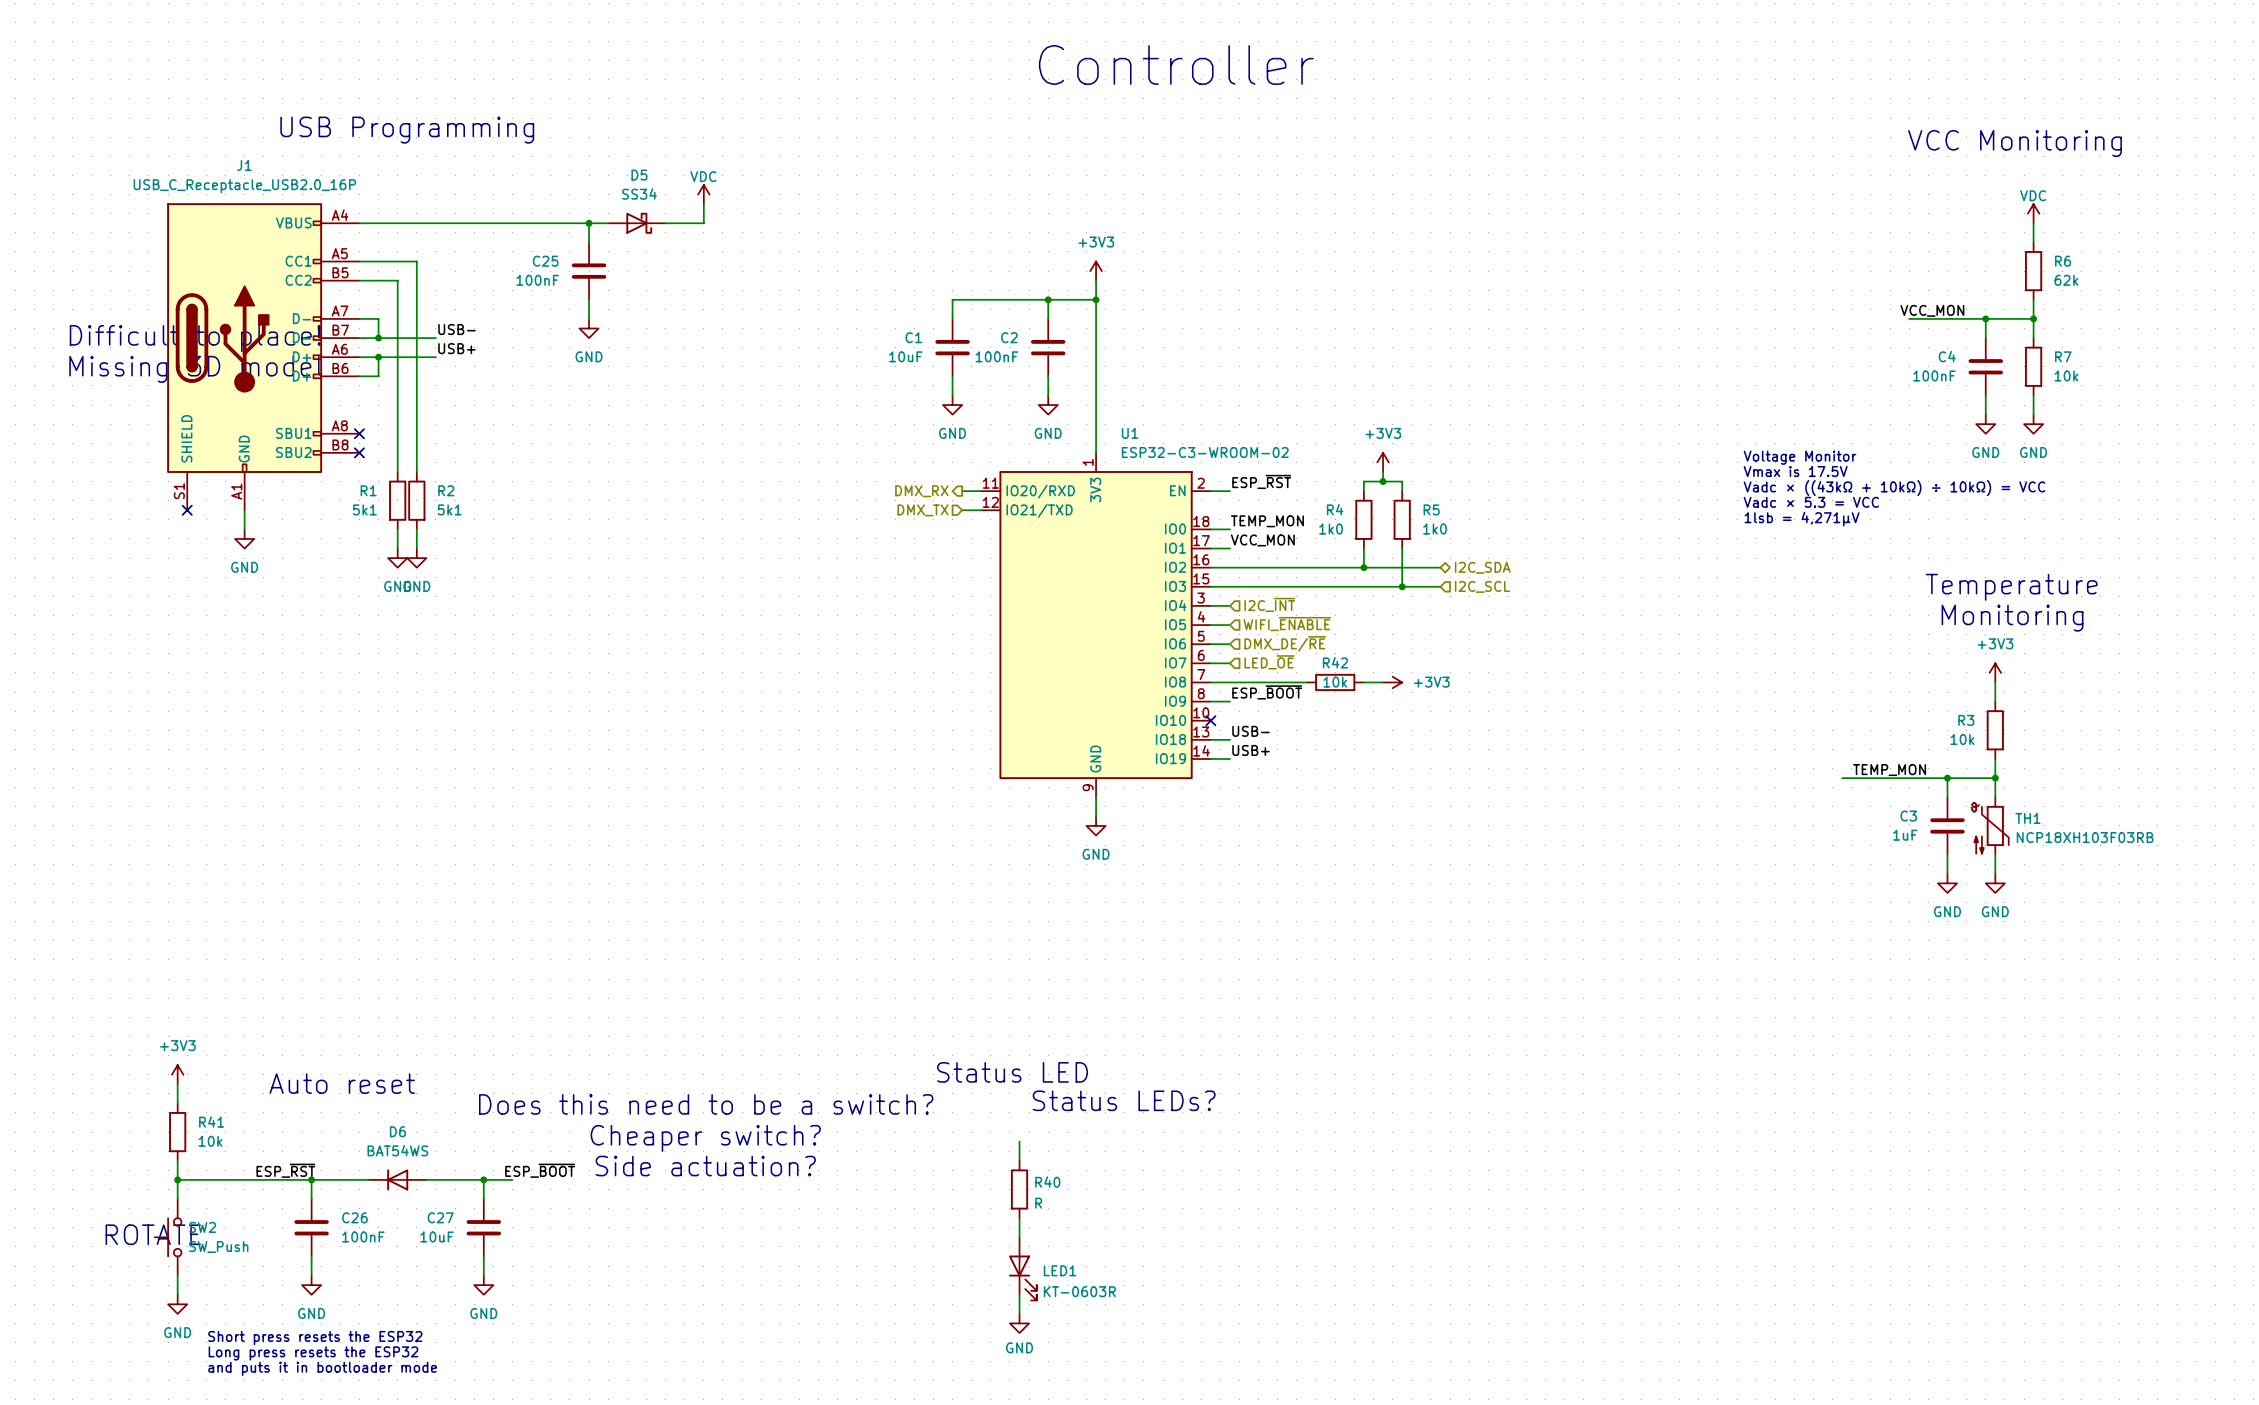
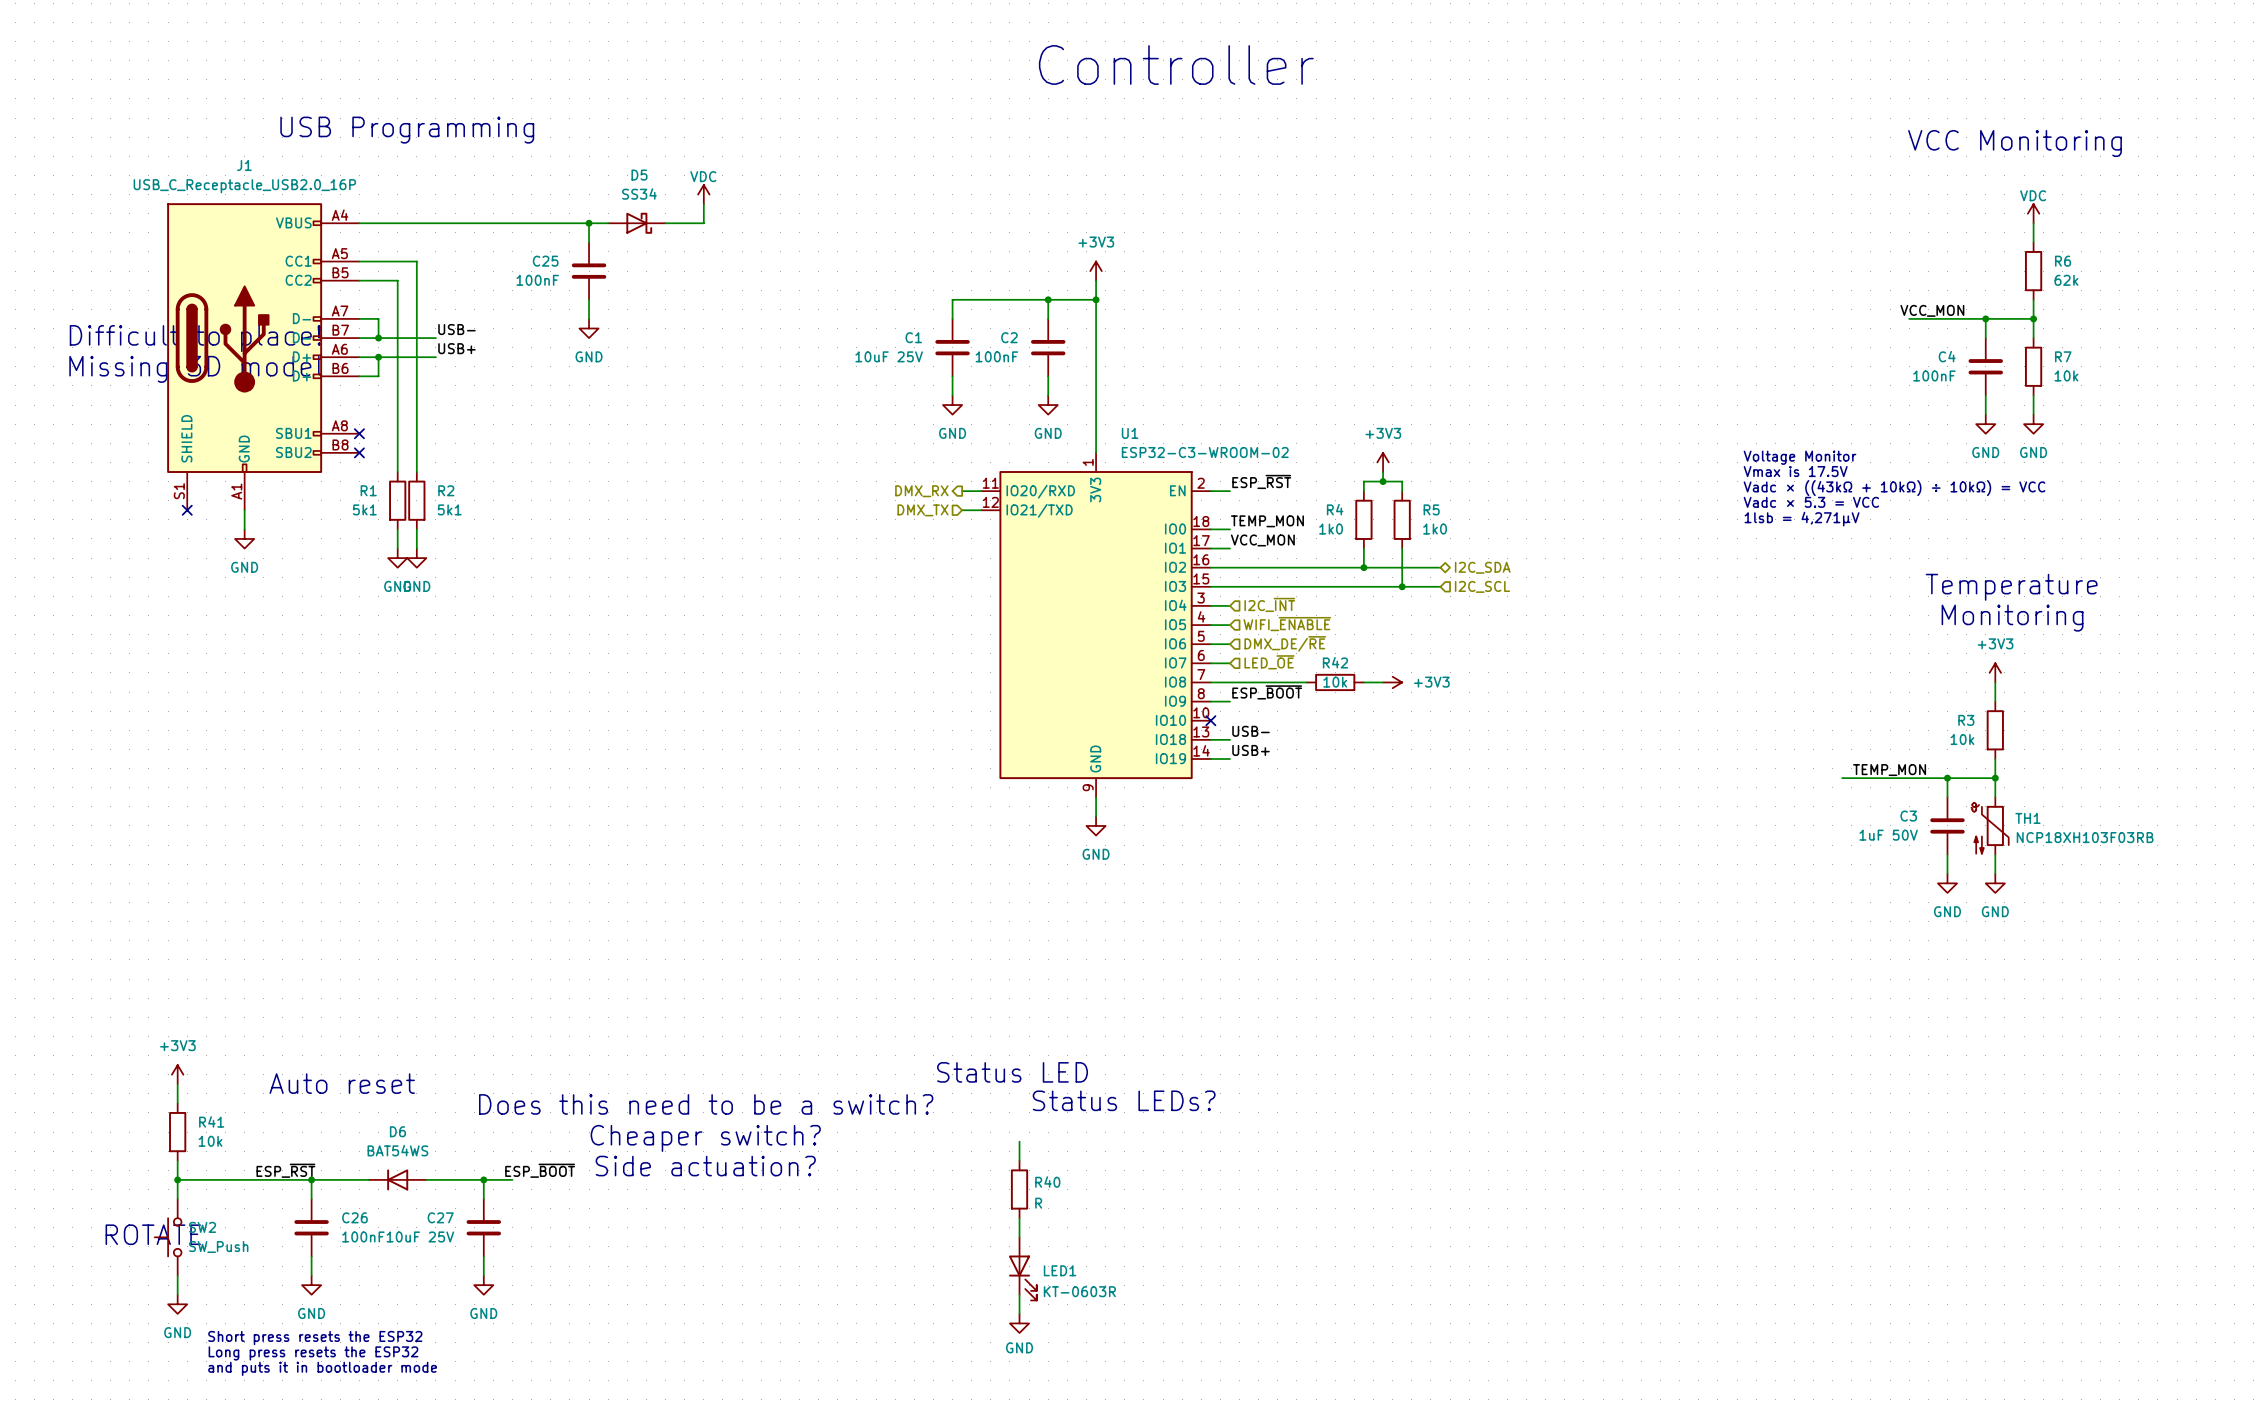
C1 value: 10uF (905, 356) -> 10uF 25V (889, 356)
C3 value: 1uF (1905, 835) -> 1uF 50V (1888, 835)
C27 value: 10uF (437, 1236) -> 10uF 25V (420, 1236)

